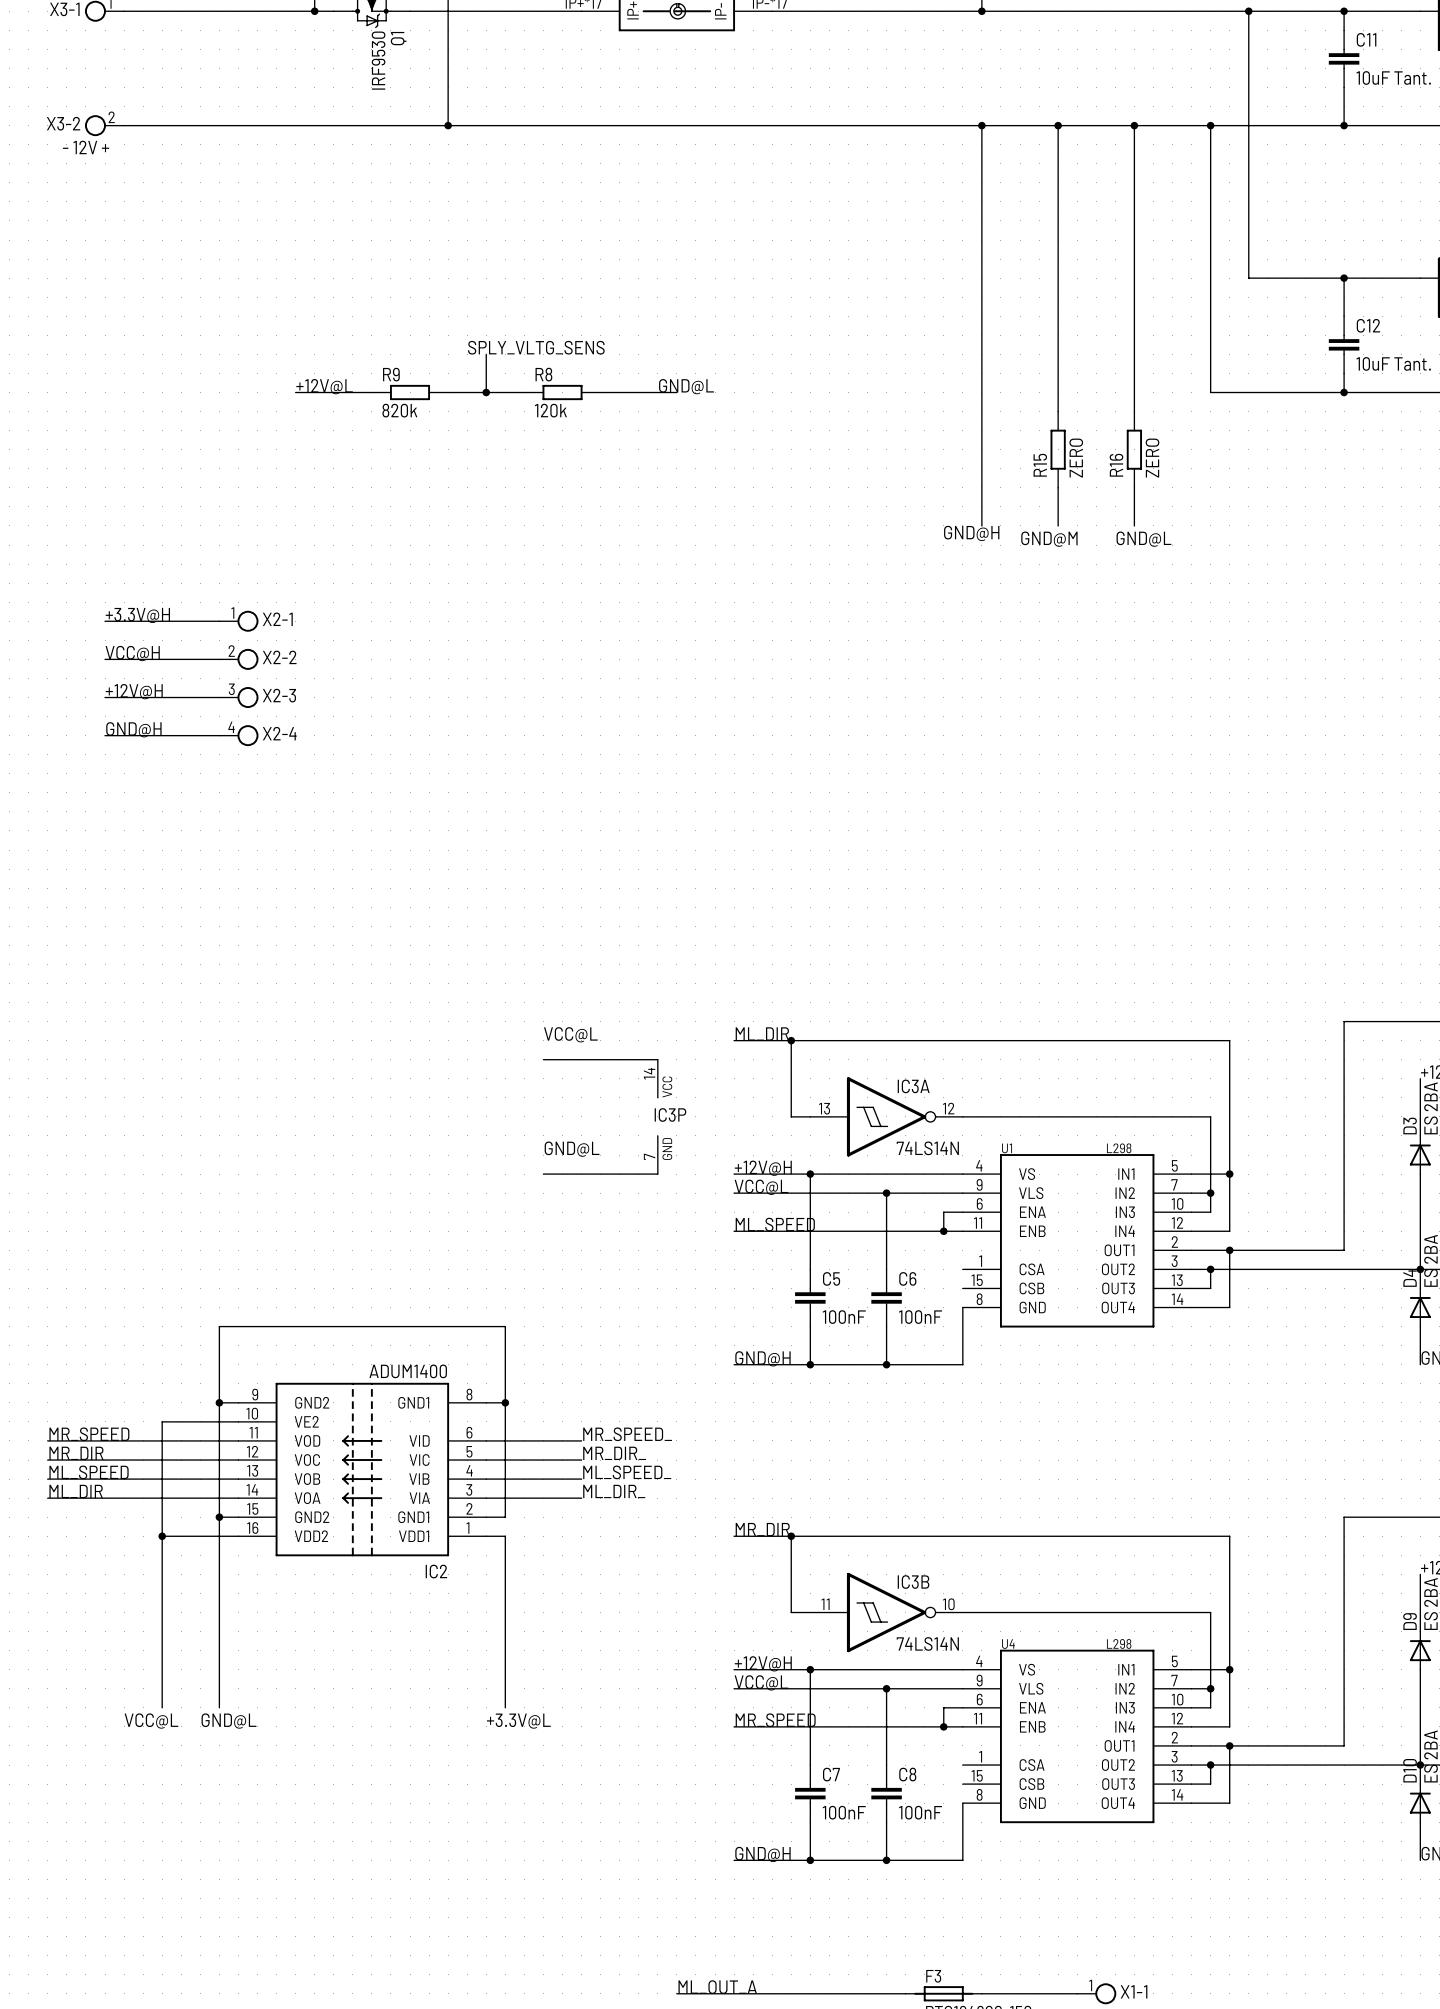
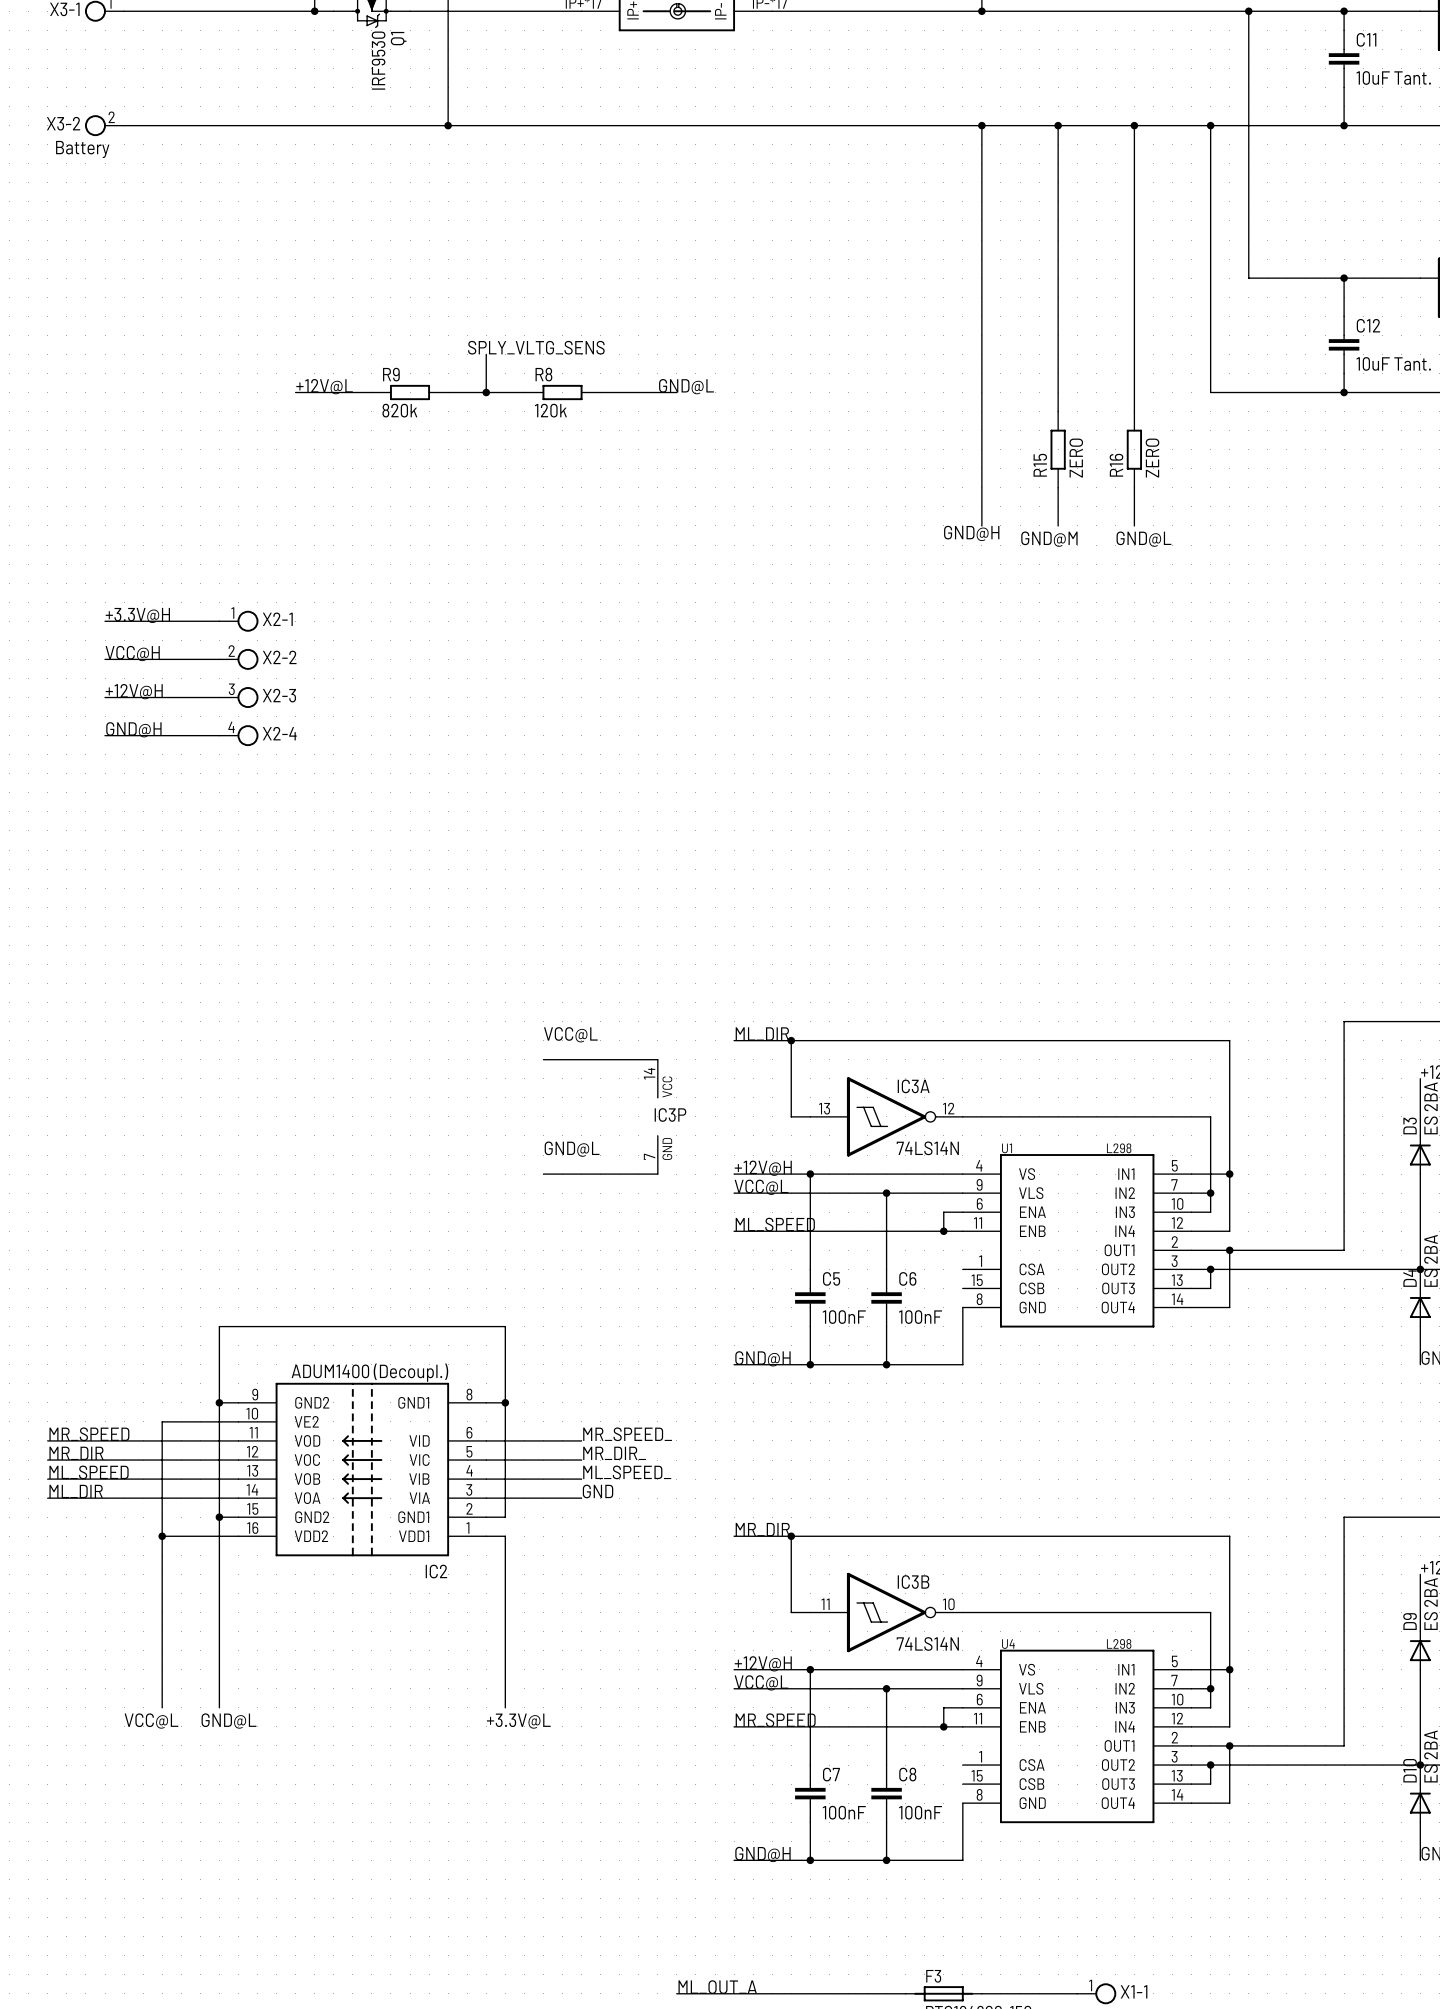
X3-2 value: - 12V + (86, 147) -> Battery (82, 149)
IC2 value: ADUM1400 (408, 1371) -> ADUM1400 (Decoupl.) (369, 1372)
label: ML_DIR_ (614, 1491) -> GND (598, 1491)

